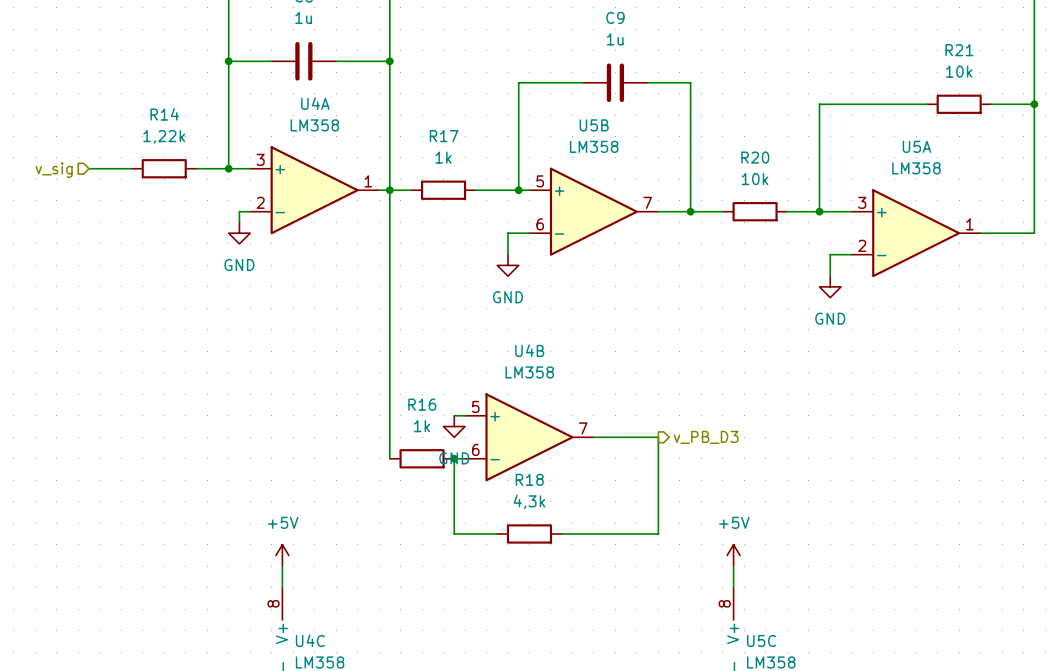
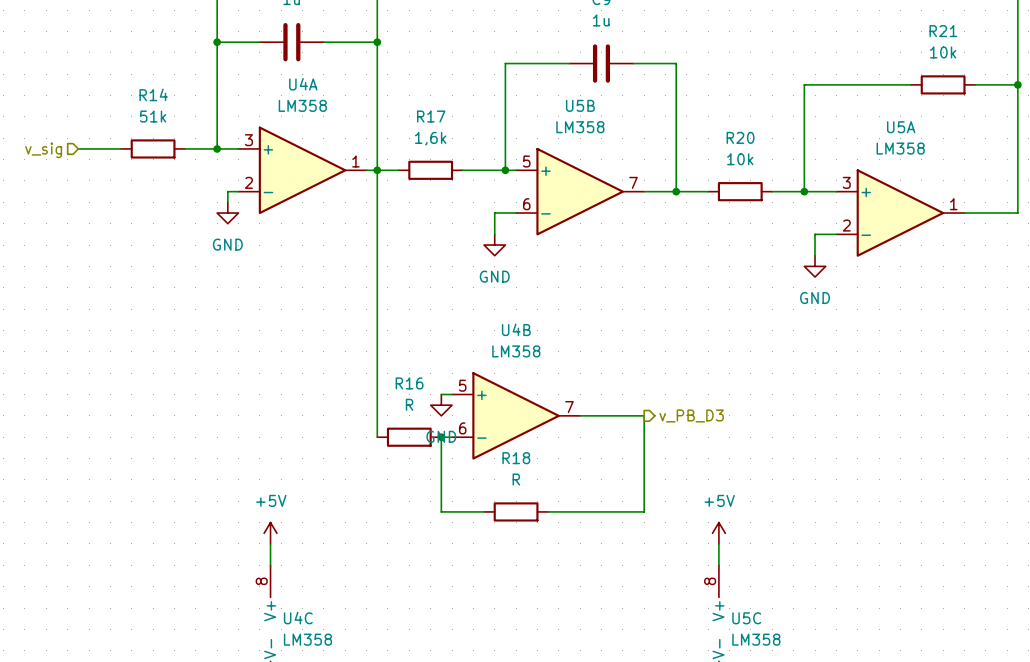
R14 value: 1,22k (164, 136) -> 51k (153, 116)
R17 value: 1k (443, 157) -> 1,6k (430, 138)
R16 value: 1k (422, 426) -> R (409, 404)
R18 value: 4,3k (529, 501) -> R (516, 479)

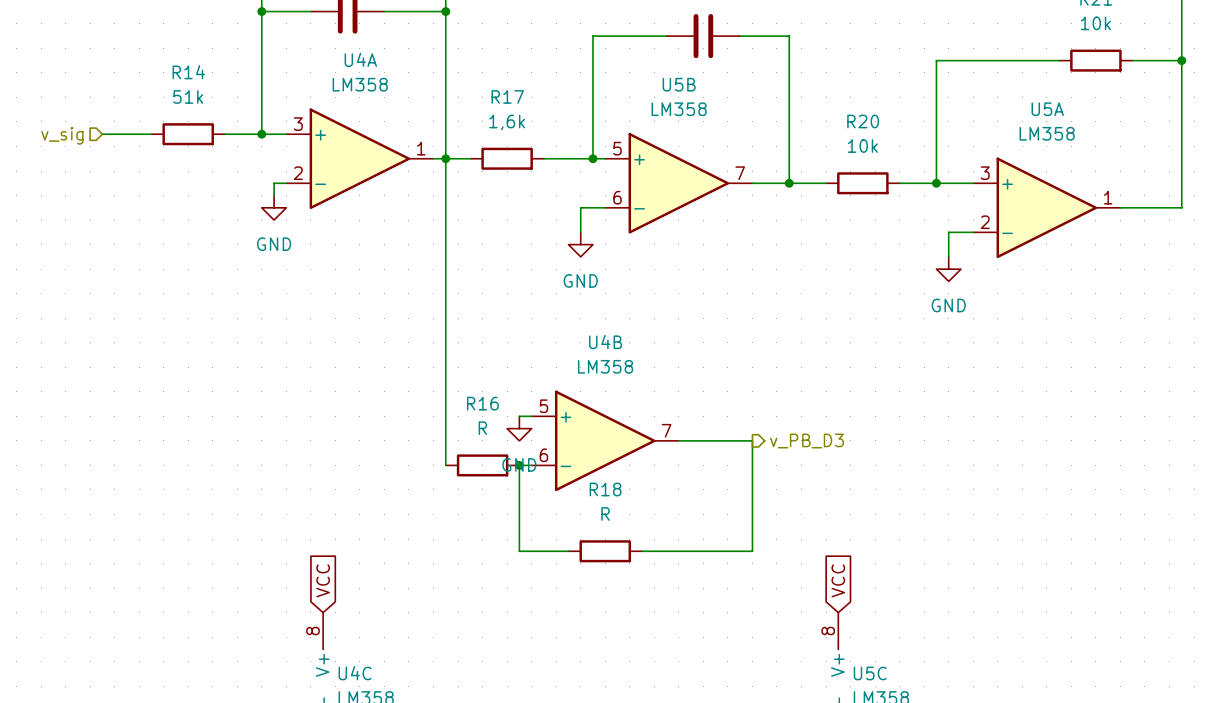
power symbol: +5V (270, 533) -> none
power symbol: +5V (718, 533) -> none
global label: none -> VCC (323, 580)
global label: none -> VCC (838, 580)
wire: (270, 543) (270, 565) -> none
wire: (718, 543) (718, 565) -> none

